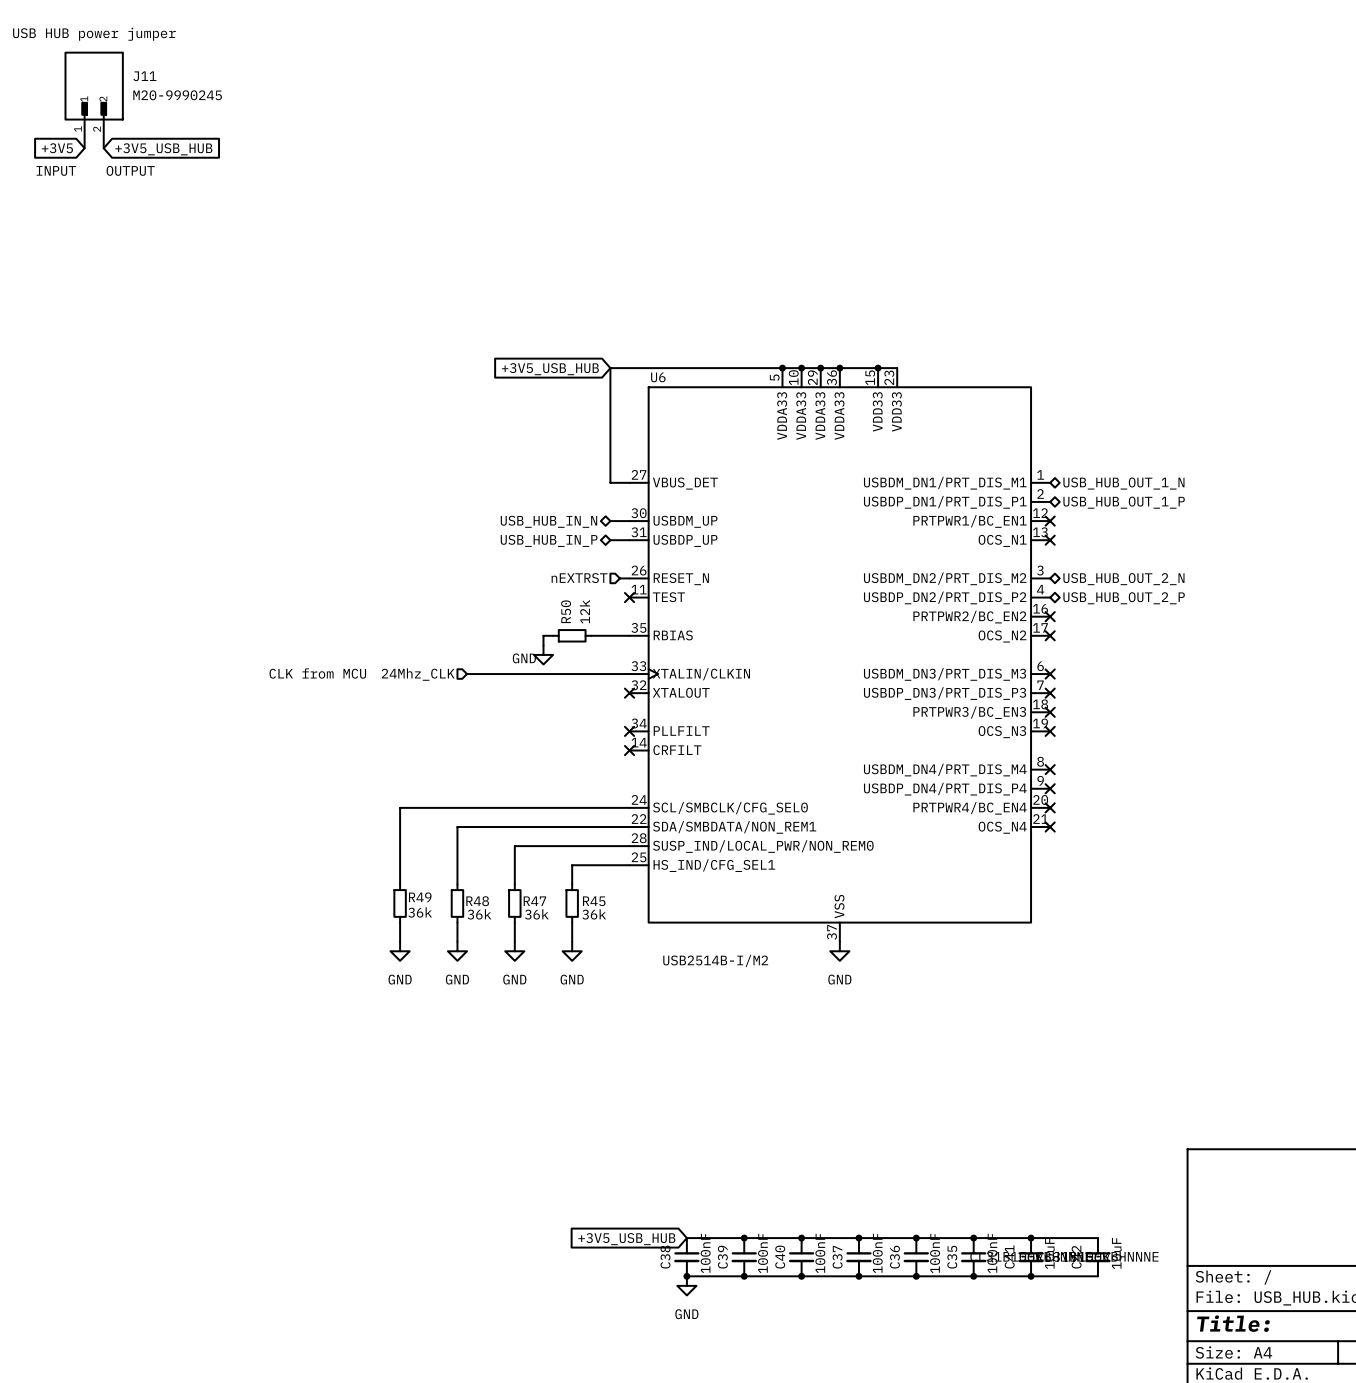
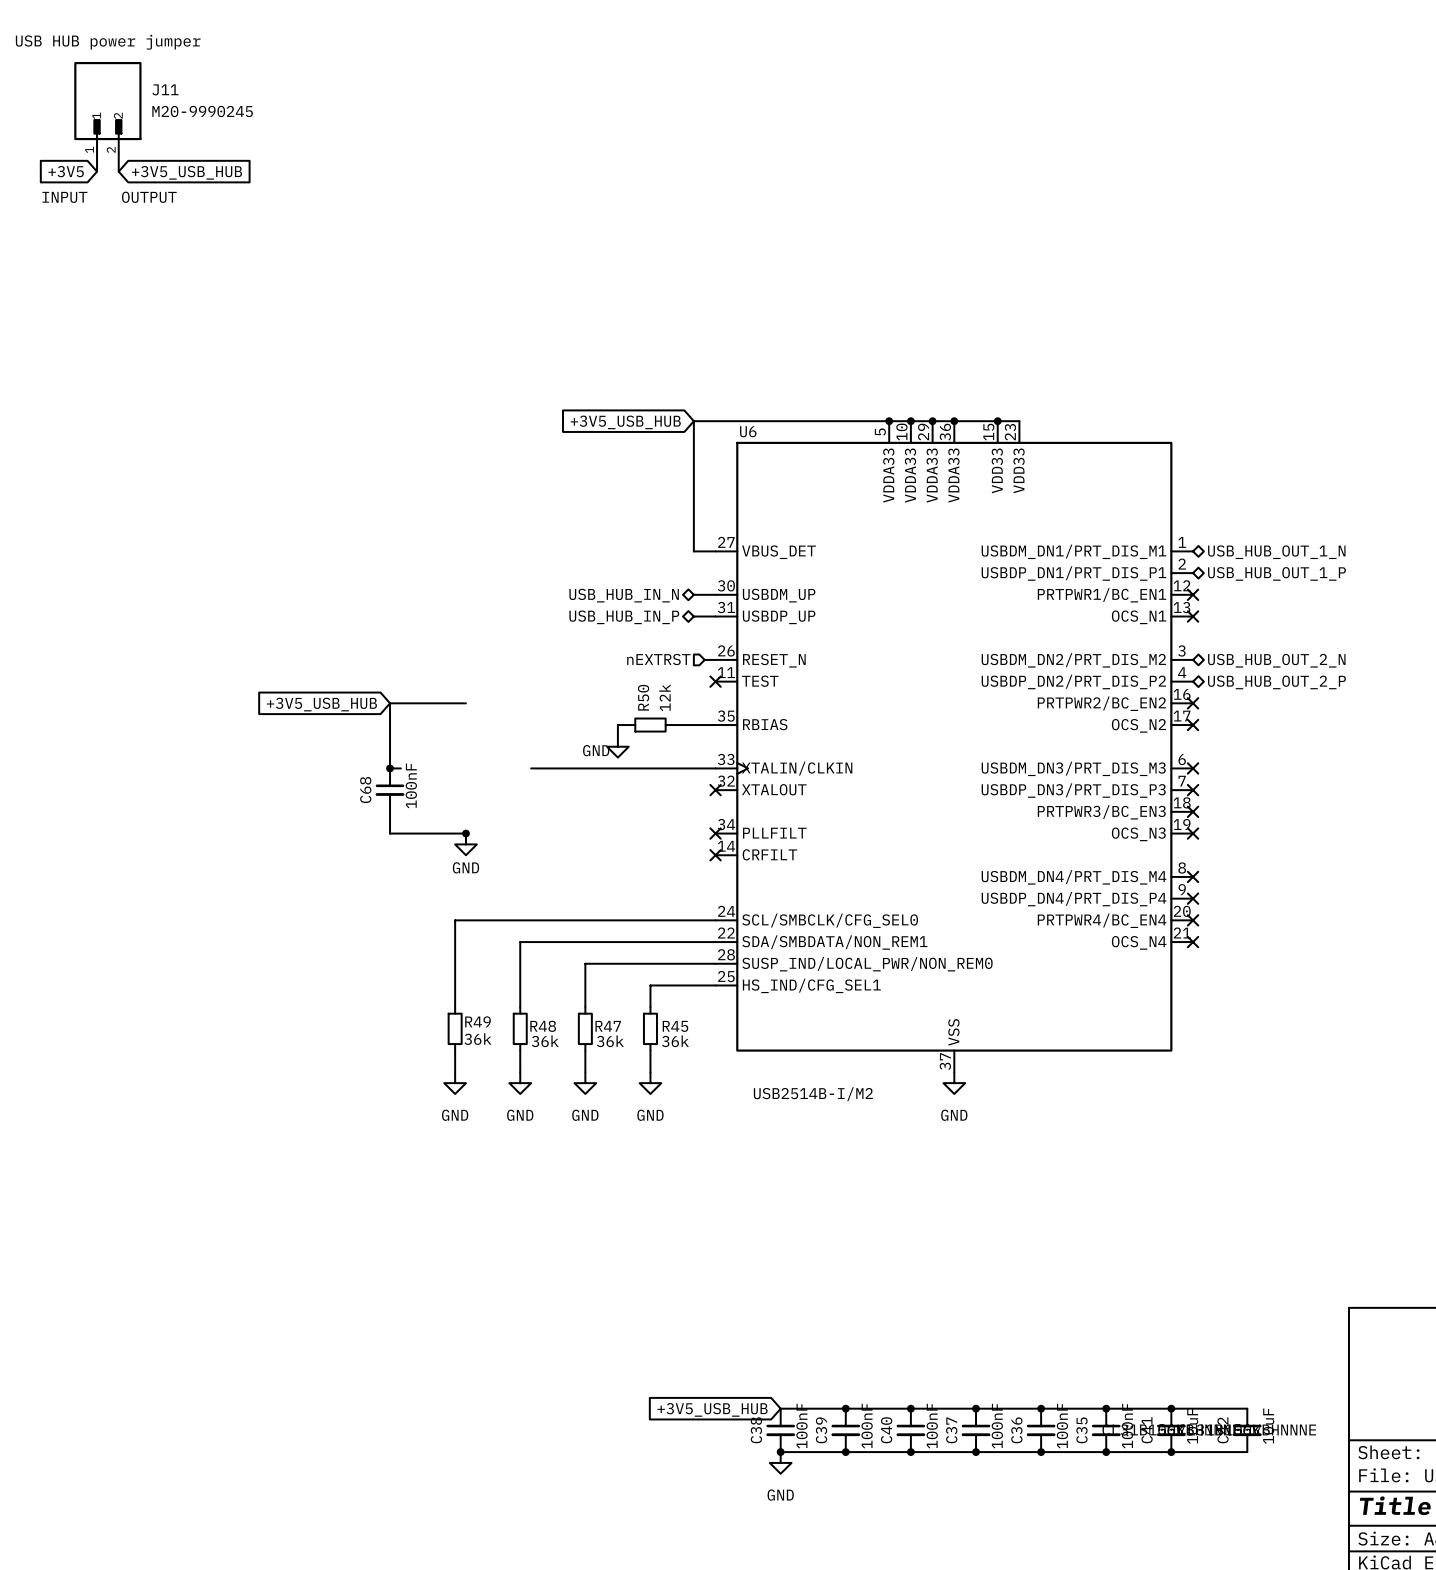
wire: none -> (465, 703) (390, 703) (390, 768) (400, 768)
global label: none -> +3V5_USB_HUB (321, 704)
text: CLK from MCU (317, 673) -> none
junction: none -> (390, 768)
hierarchical label: 24Mhz_CLK (418, 674) -> none
C68: none -> 100nF (390, 790)
wire: none -> (390, 811) (390, 833) (465, 833)
junction: none -> (465, 833)
power symbol: none -> GND (465, 844)

